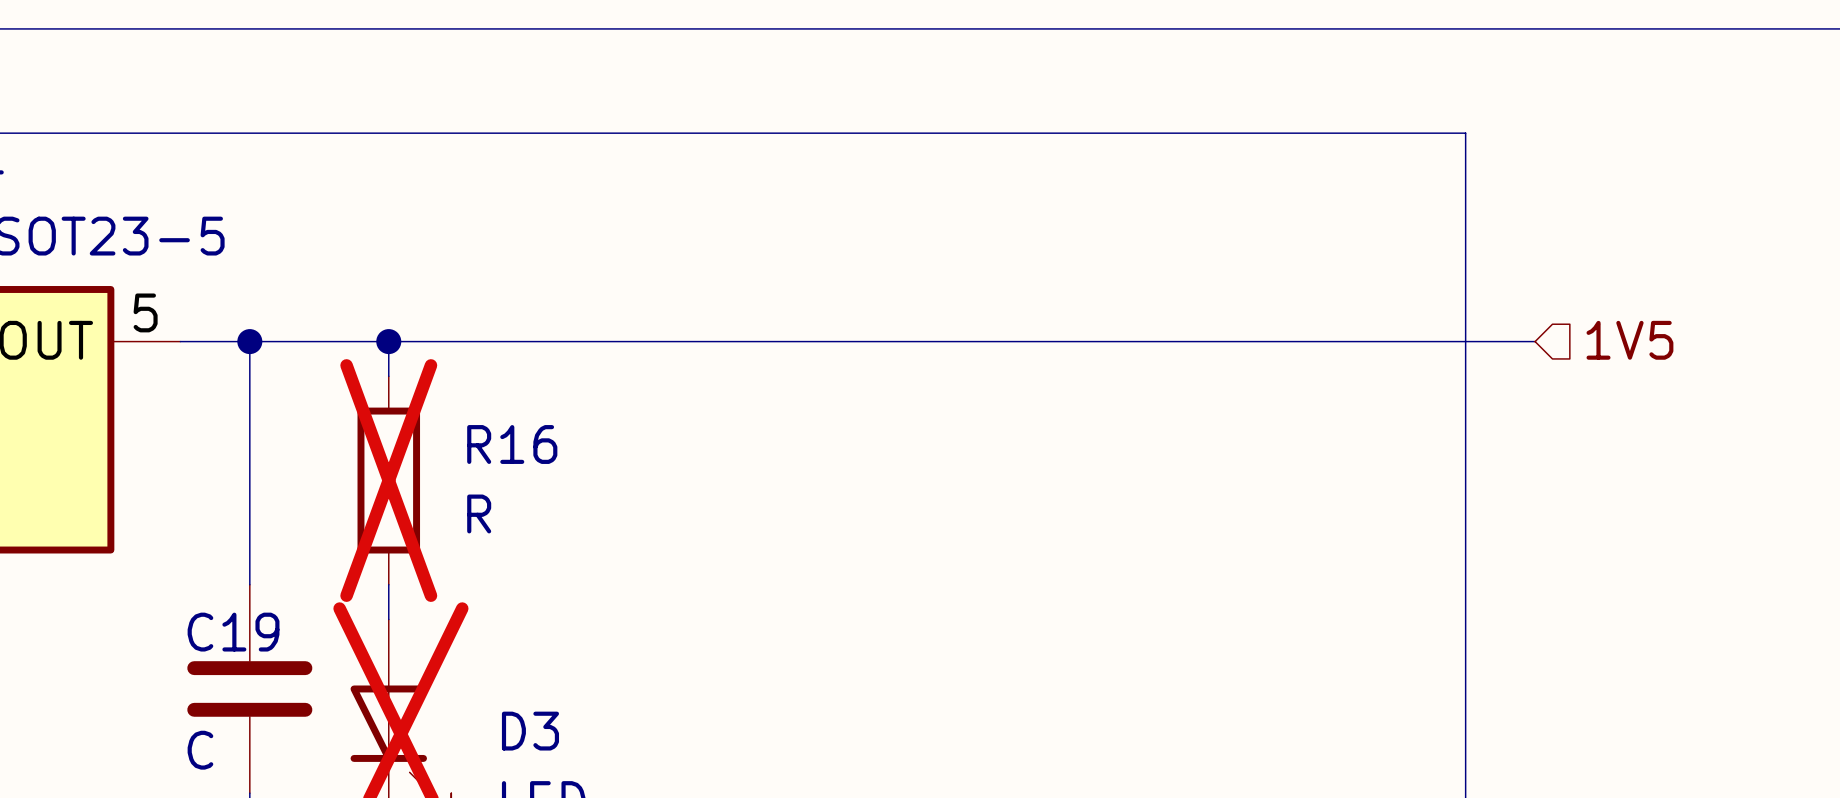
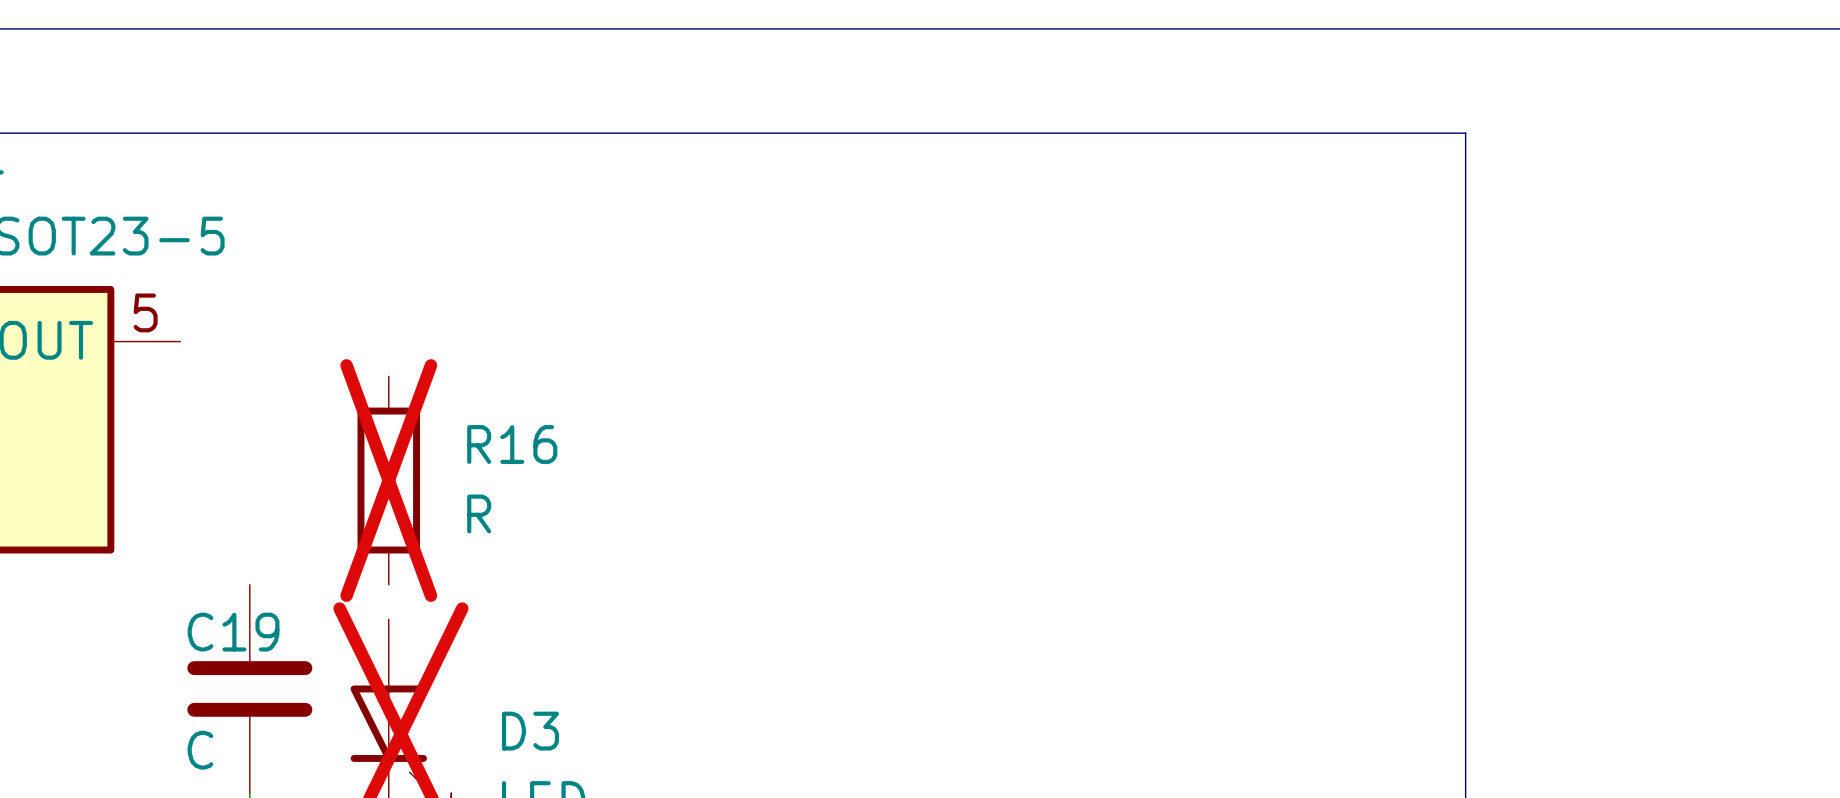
hierarchical label: 1V5 (1629, 340) -> none
wire: (180, 341) (1535, 341) -> none
wire: (249, 341) (249, 584) -> none
junction: (249, 341) -> none
wire: (388, 341) (388, 376) -> none
junction: (388, 341) -> none
wire: (388, 584) (388, 619) -> none

